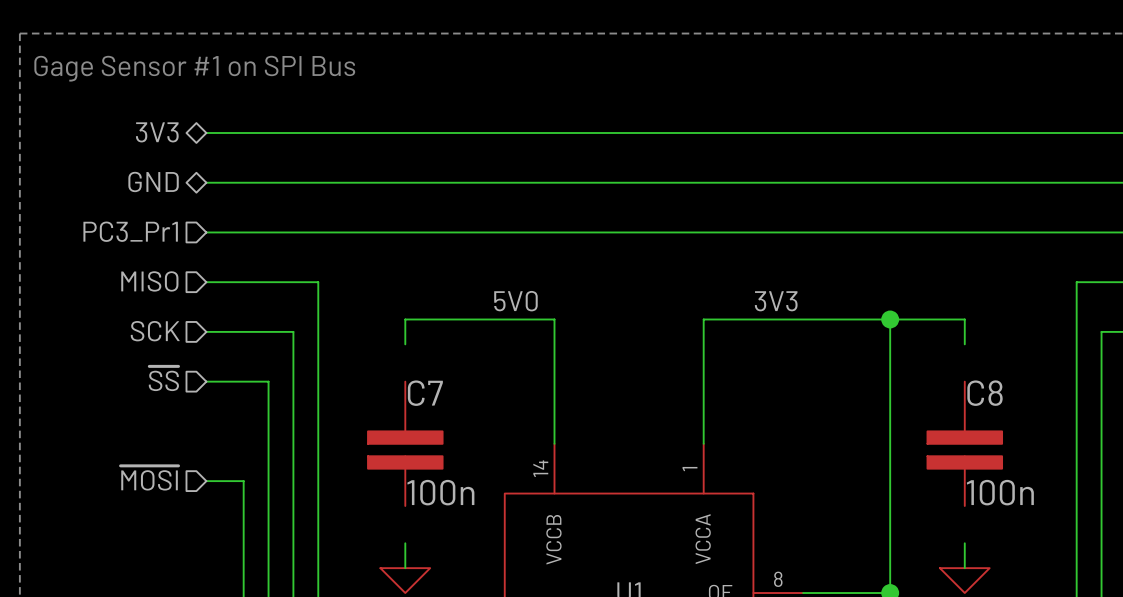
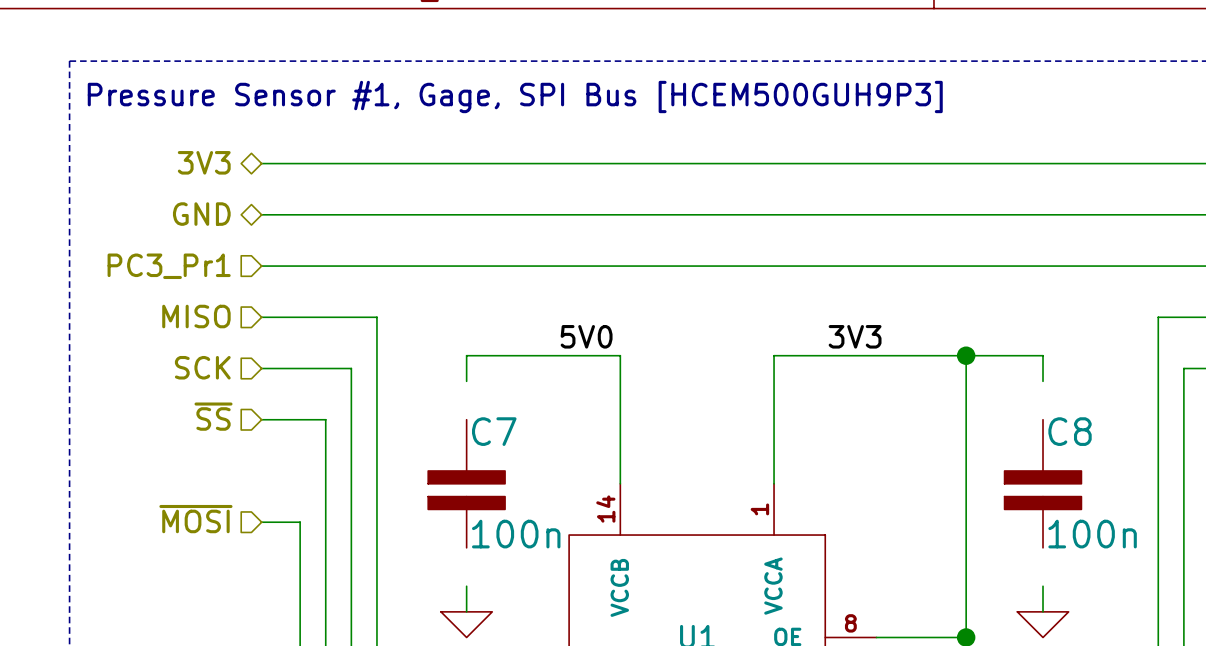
text: Gage Sensor #1 on SPI Bus (194, 68) -> Pressure Sensor #1, Gage, SPI Bus [HCEM500GUH9P3] (515, 96)

